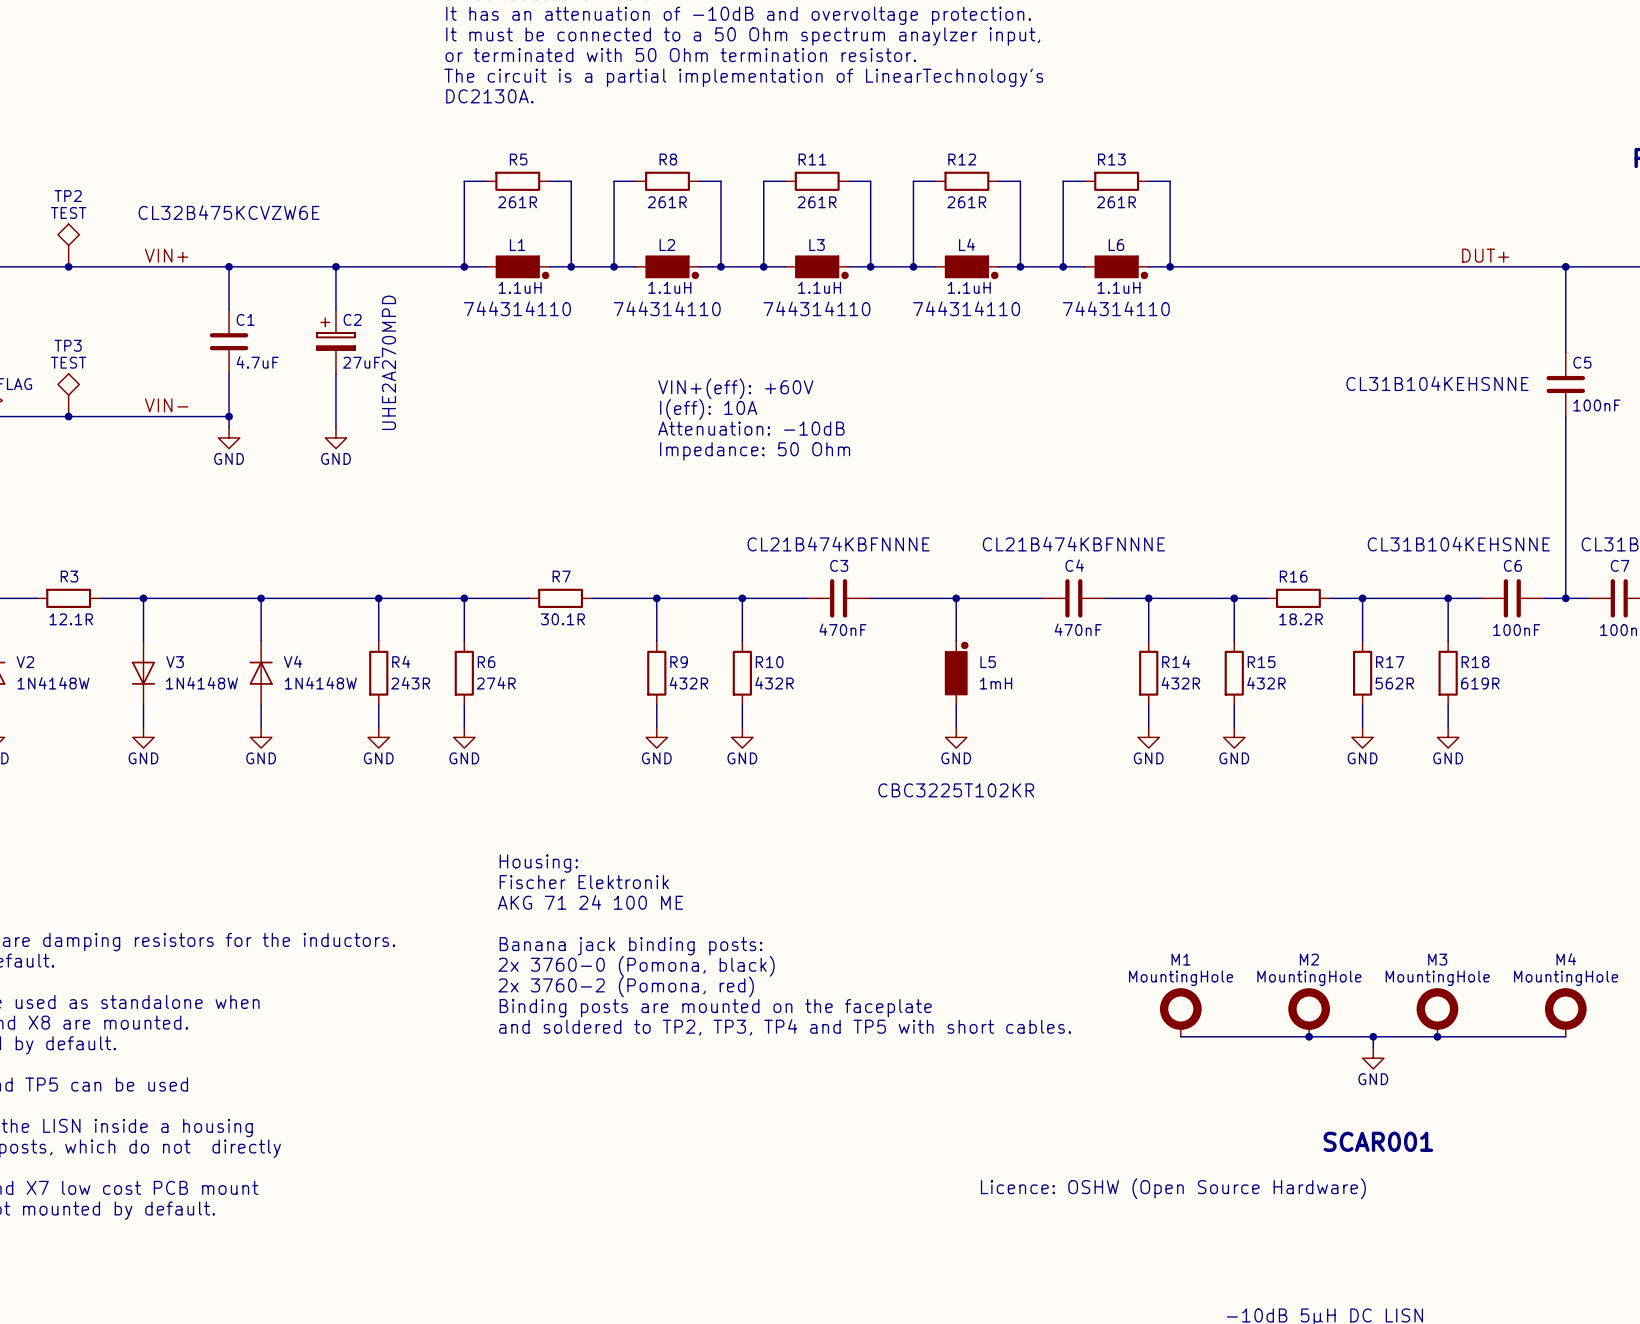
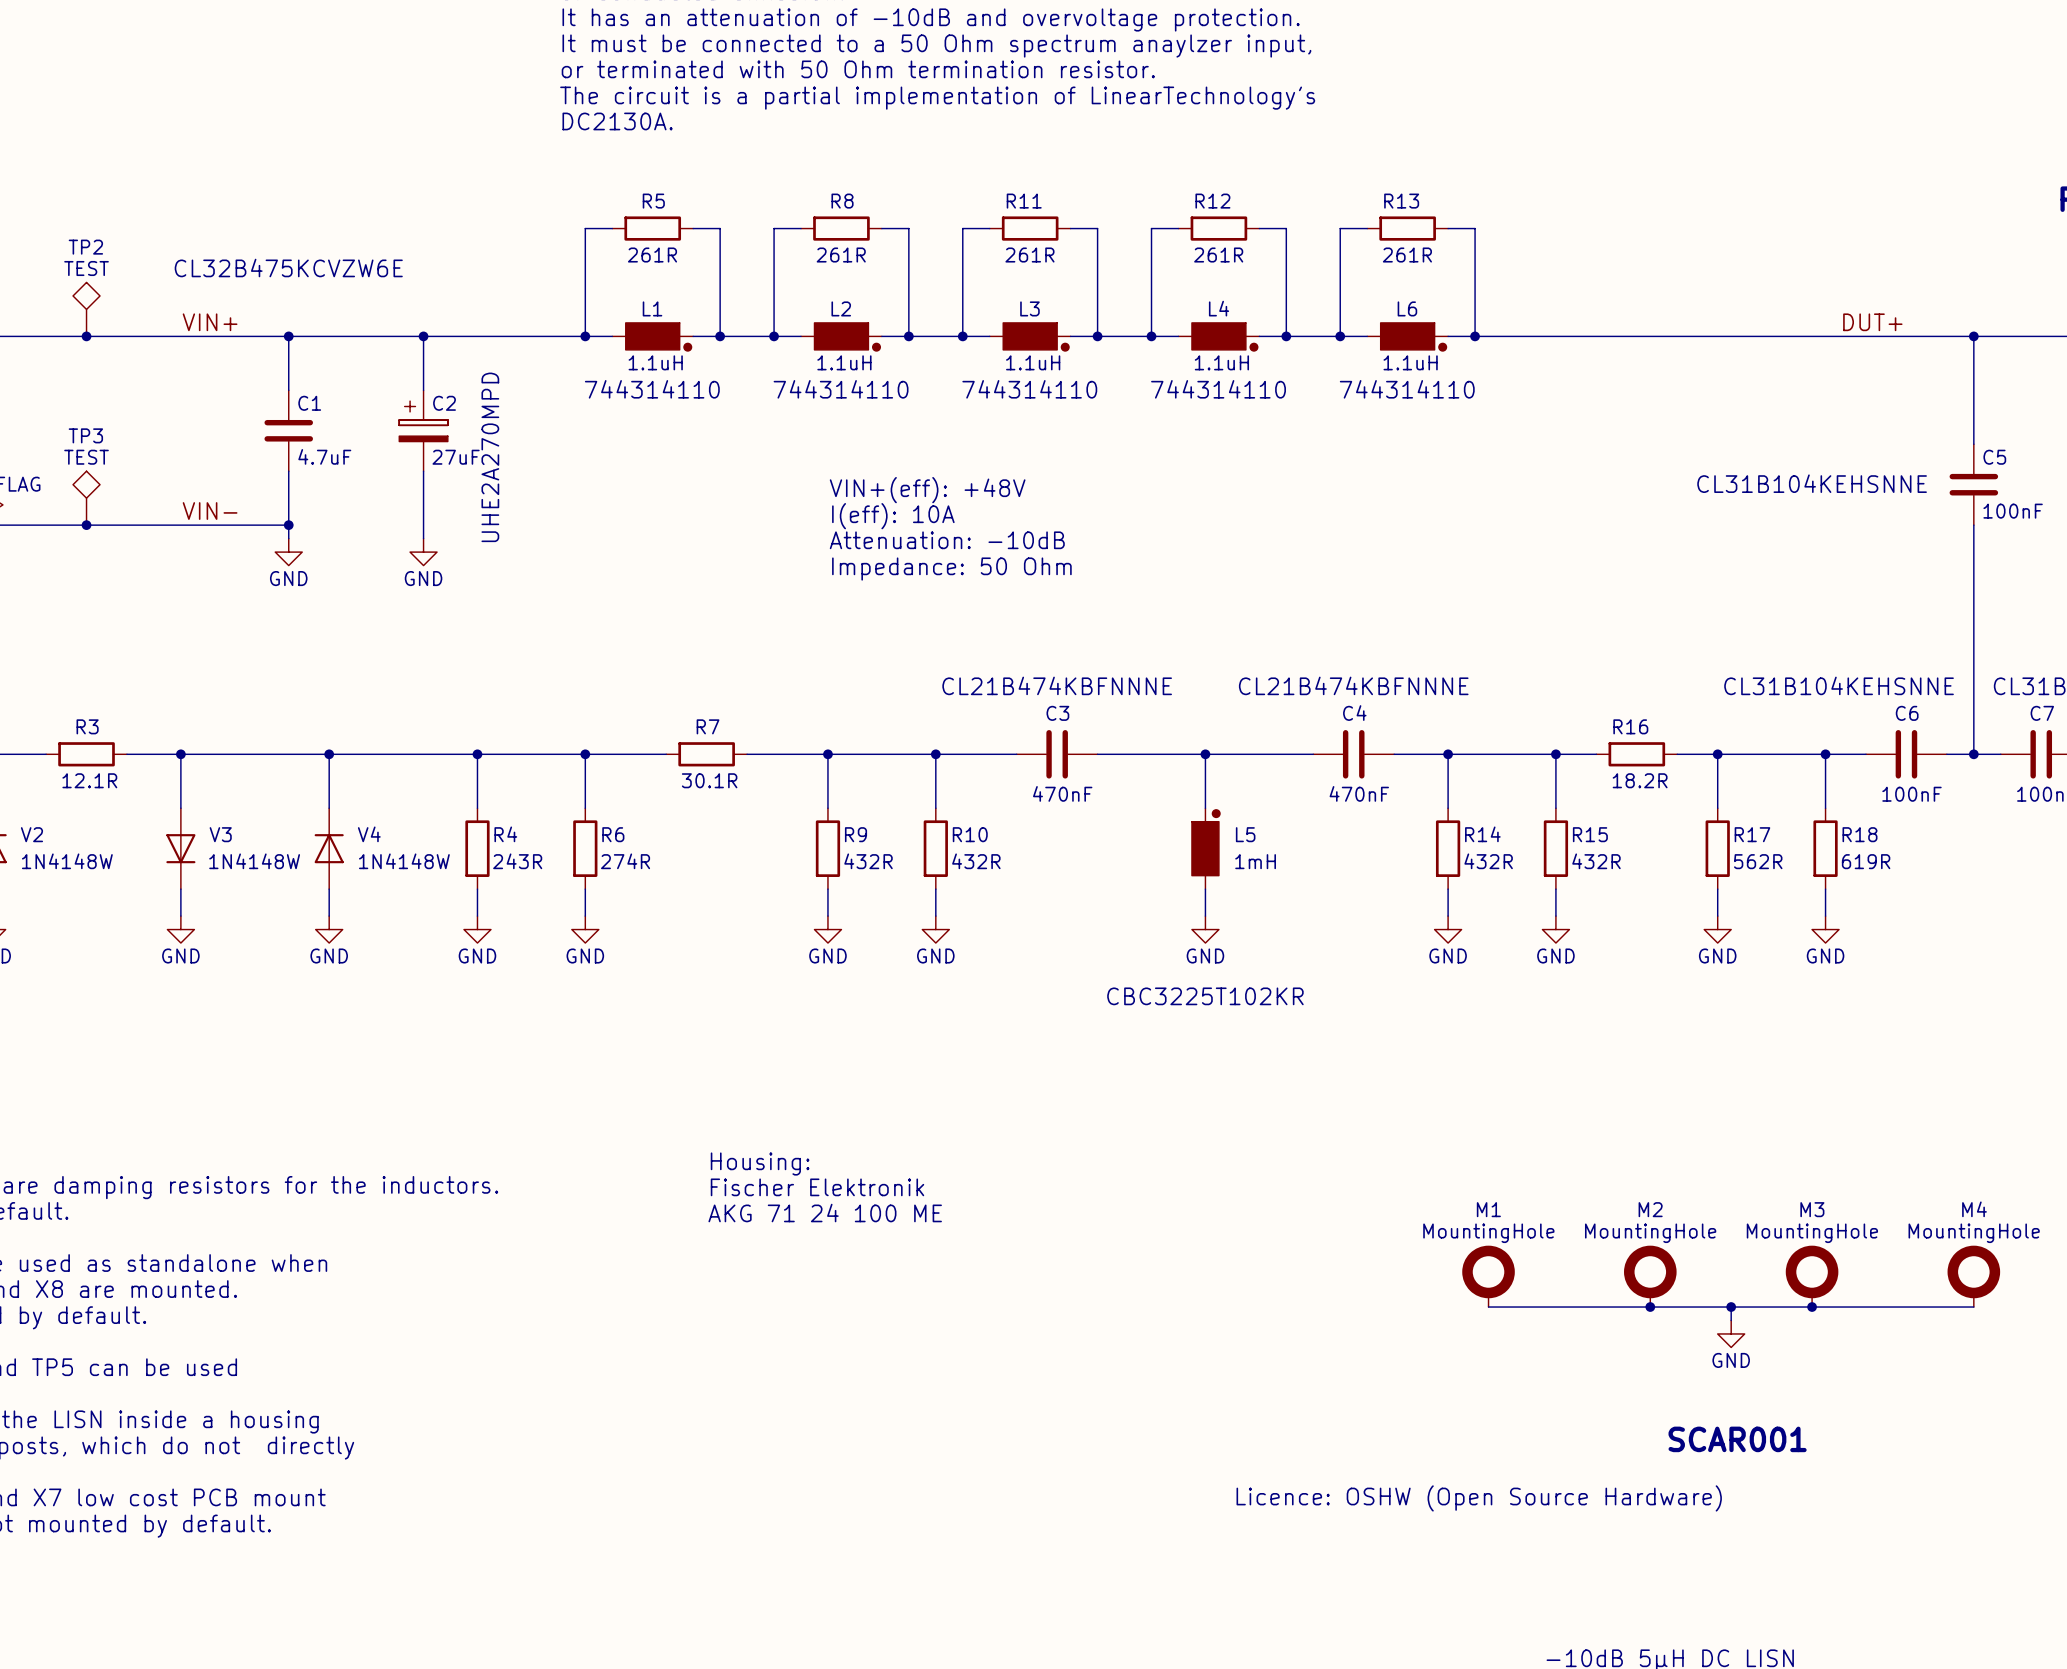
text: VIN+(eff): +60V (735, 388) -> VIN+(eff): +48V (927, 490)
text position: Housing: (538, 863) -> Housing: (760, 1164)
text position: Fischer Elektronik (584, 882) -> Fischer Elektronik (817, 1187)
text position: AKG 71 24 100 ME (590, 902) -> AKG 71 24 100 ME (825, 1213)
text: Banana jack binding posts: (631, 946) -> none
text: 2x 3760-0 (Pomona, black) (636, 966) -> none
text: 2x 3760-2 (Pomona, red) (626, 986) -> none
text: Binding posts are mounted on the faceplate (715, 1008) -> none
text: and soldered to TP2, TP3, TP4 and TP5 with short cables. (785, 1027) -> none

